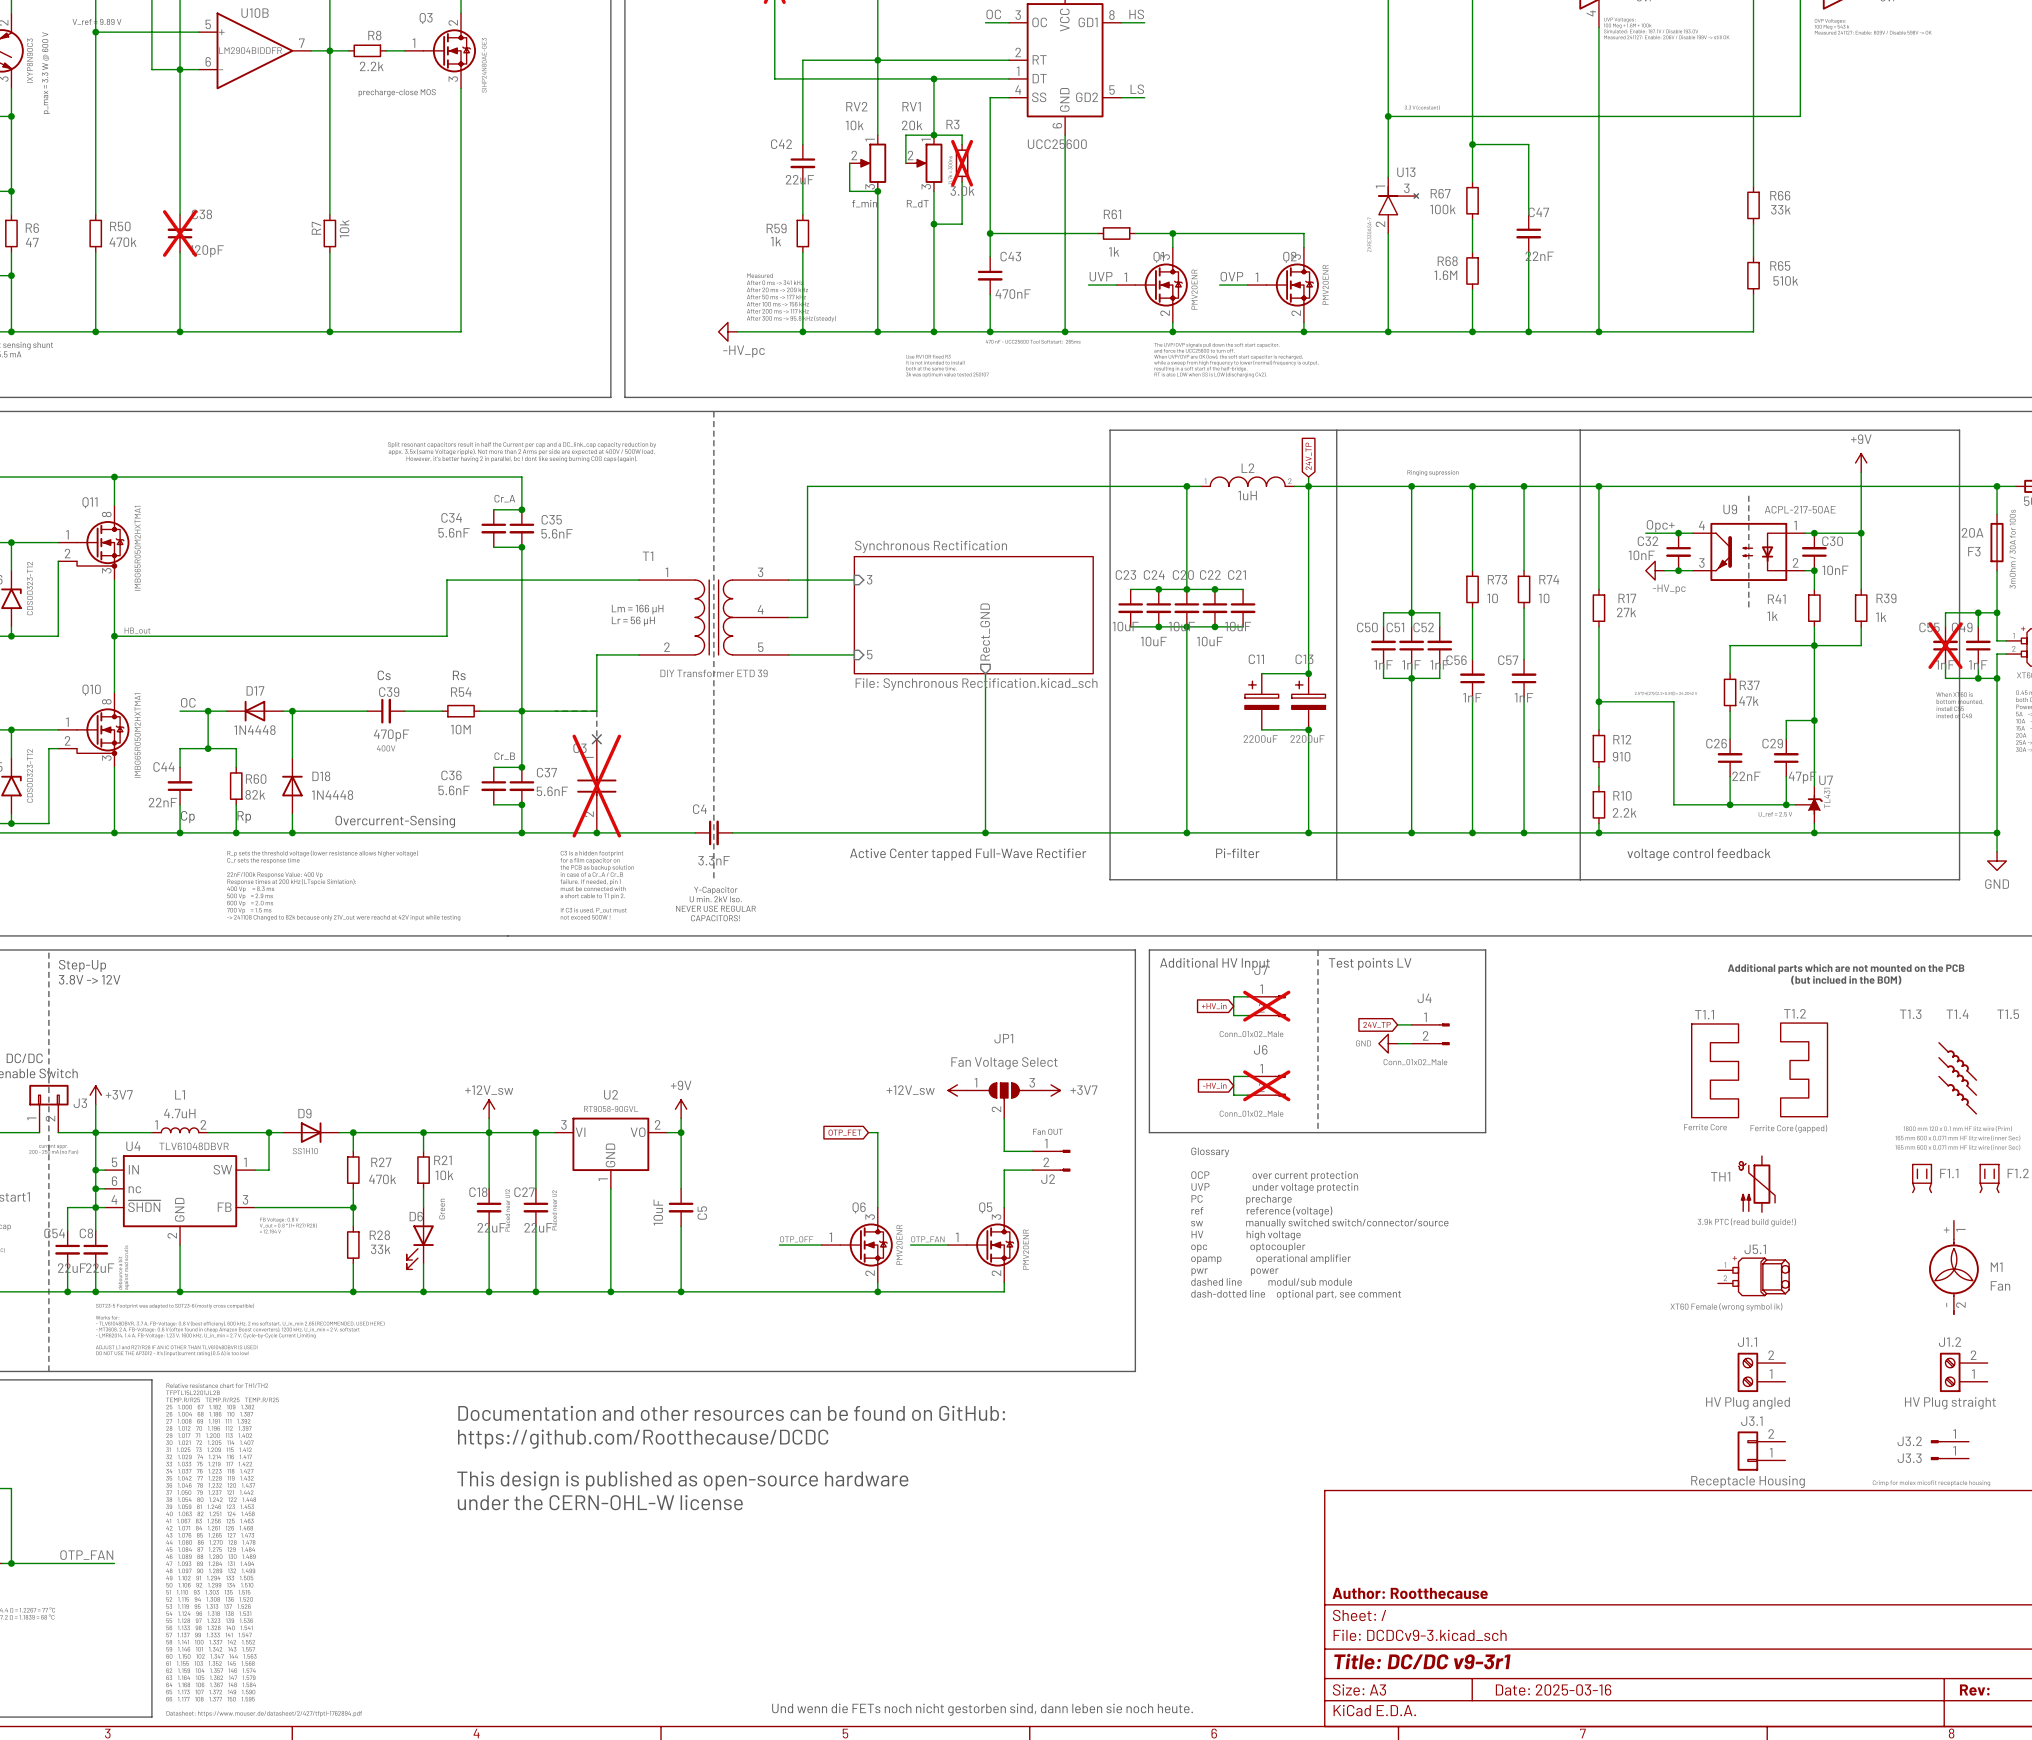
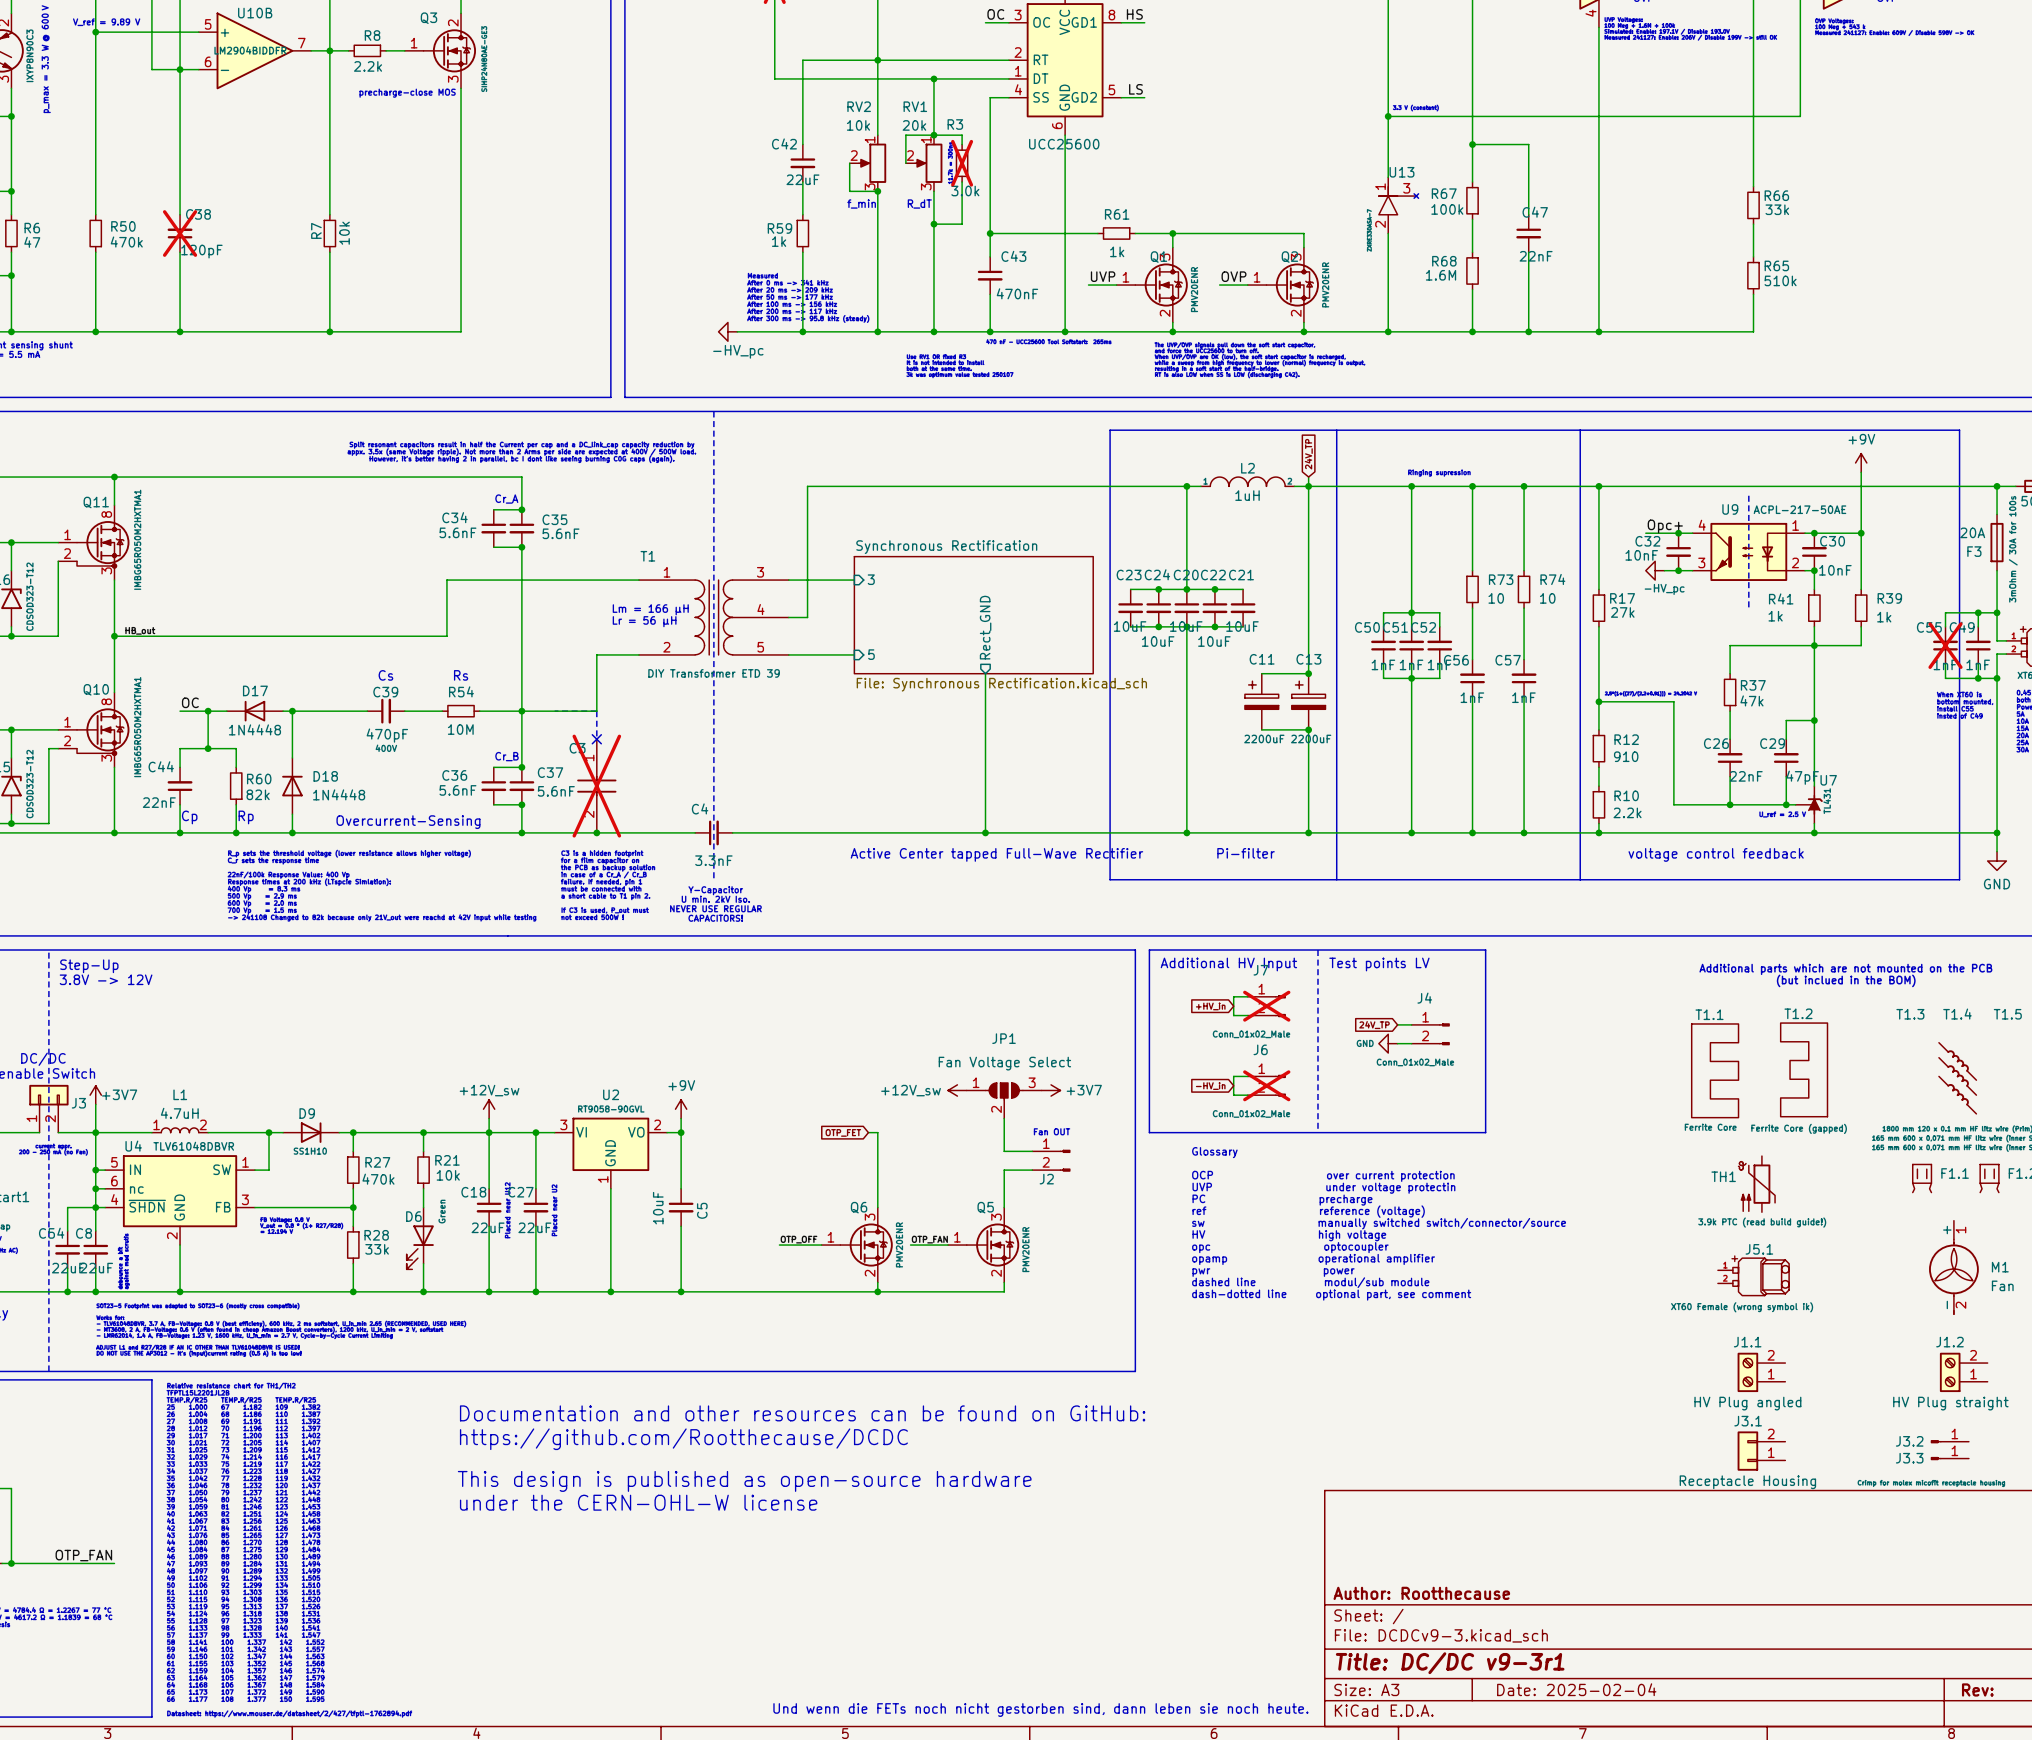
title block: Date: 2025-03-16 (1553, 1689) -> Date: 2025-02-04 (1576, 1689)

